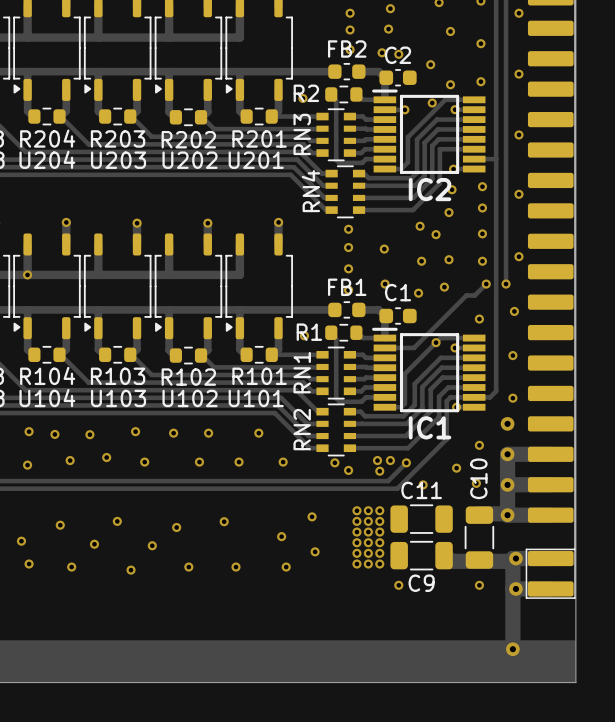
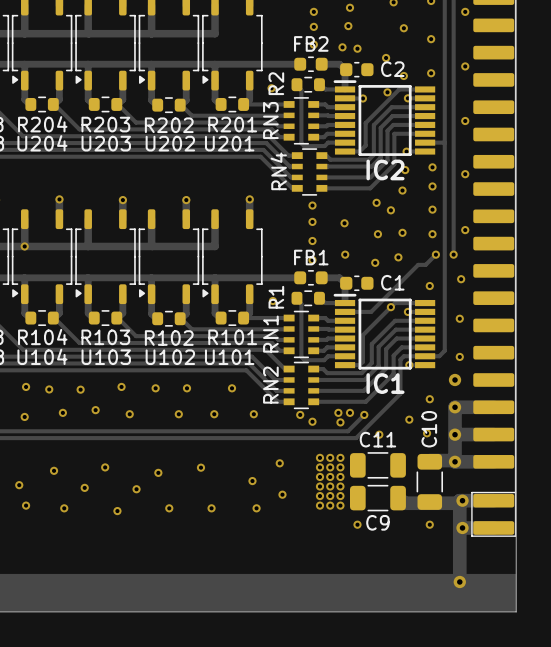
C2 name position: C2 (398, 55) -> C2 (392, 69)
R2 name rotation: 0° (306, 93) -> 90° counterclockwise (276, 83)
C1 name position: C1 (398, 292) -> C1 (392, 282)
R1 name rotation: 0° (309, 332) -> 90° counterclockwise (276, 297)

